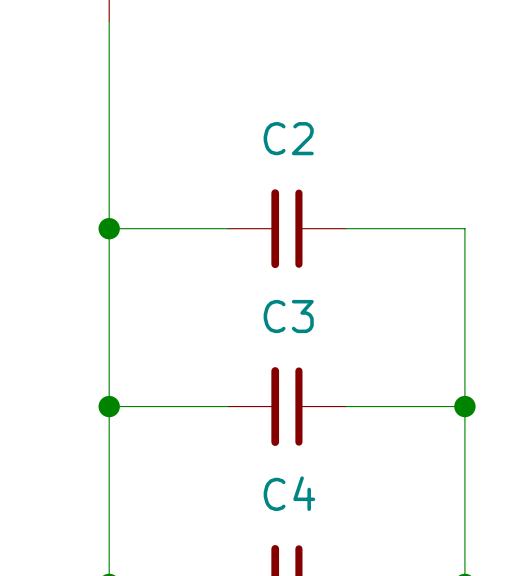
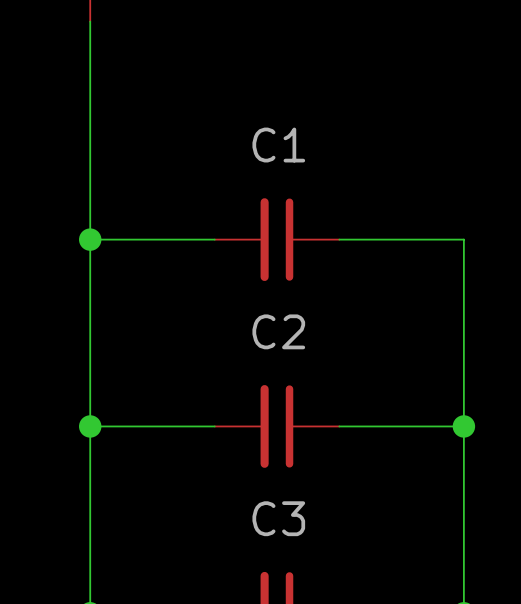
C2 name: C2 (288, 138) -> C1 (278, 145)
C3 name: C3 (288, 316) -> C2 (278, 331)
C4 name: C4 (289, 493) -> C3 (278, 518)

